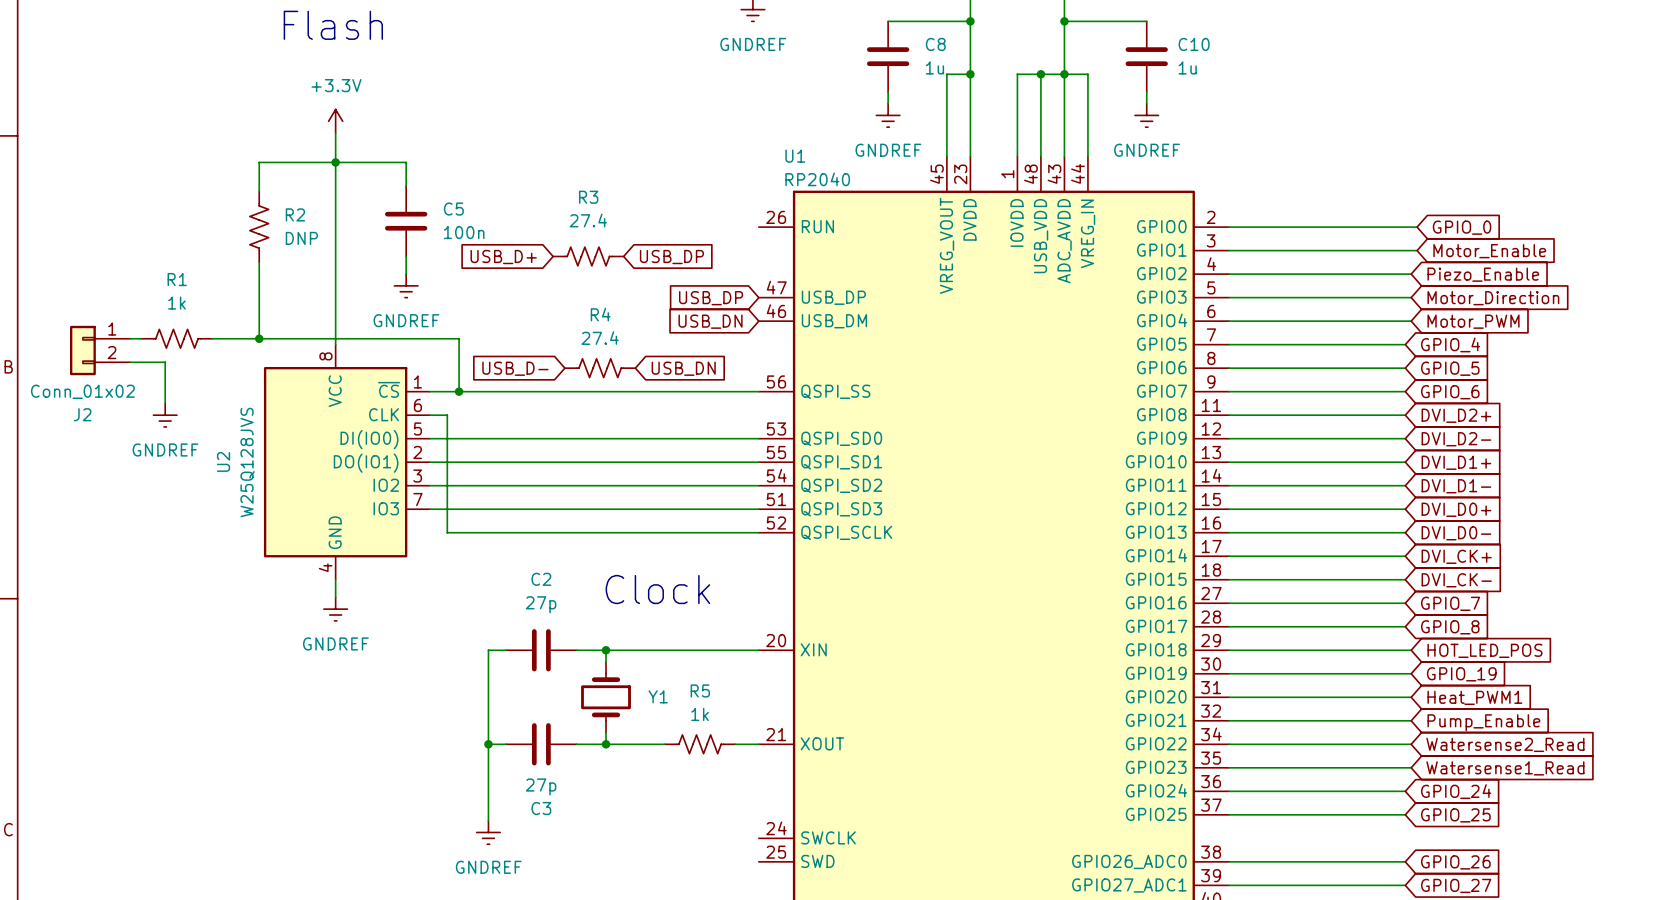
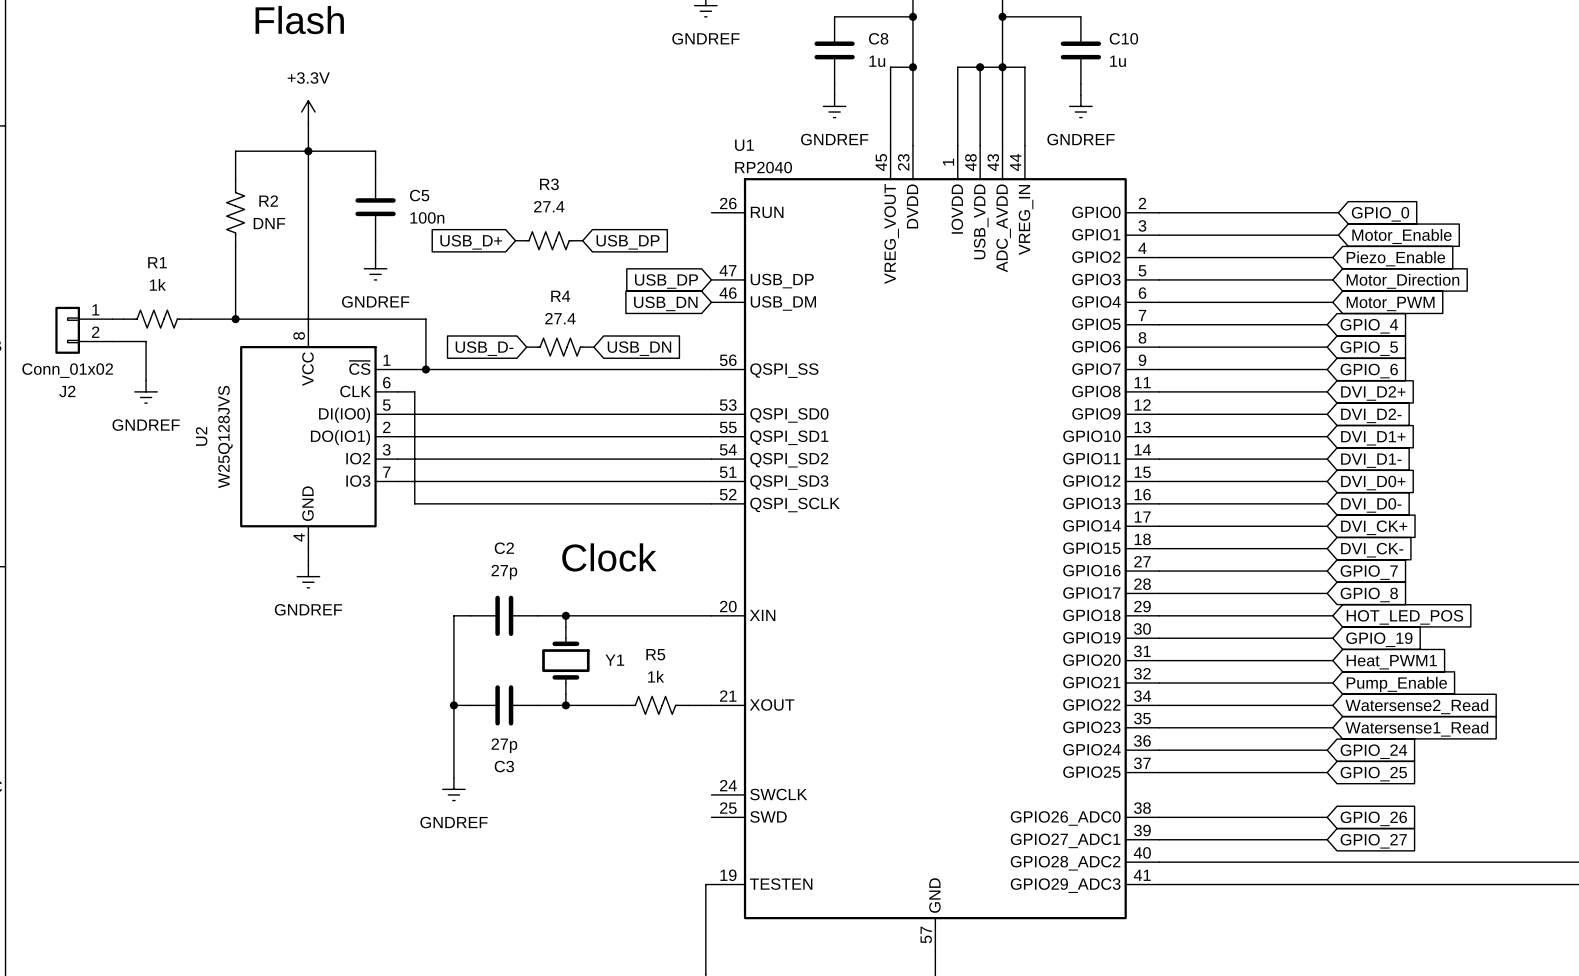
R2 value: DNP (301, 238) -> DNF (269, 223)

